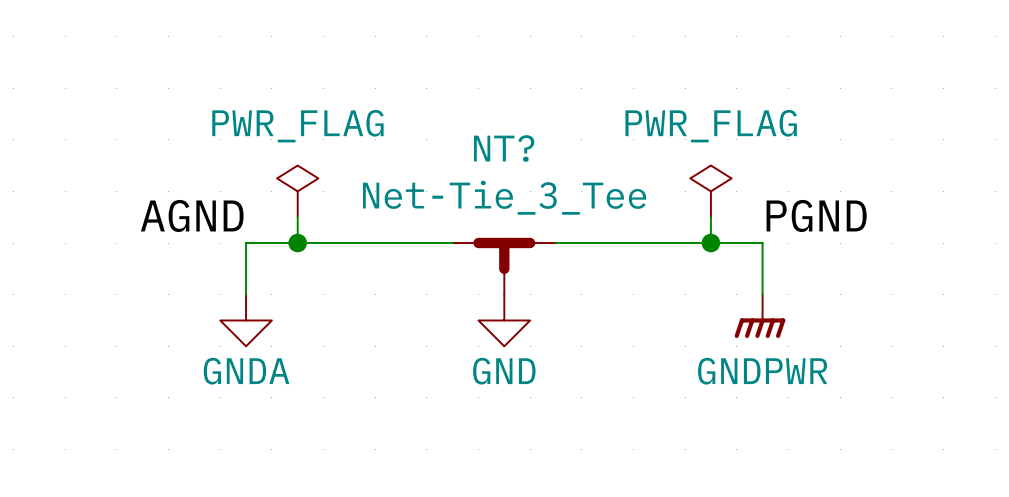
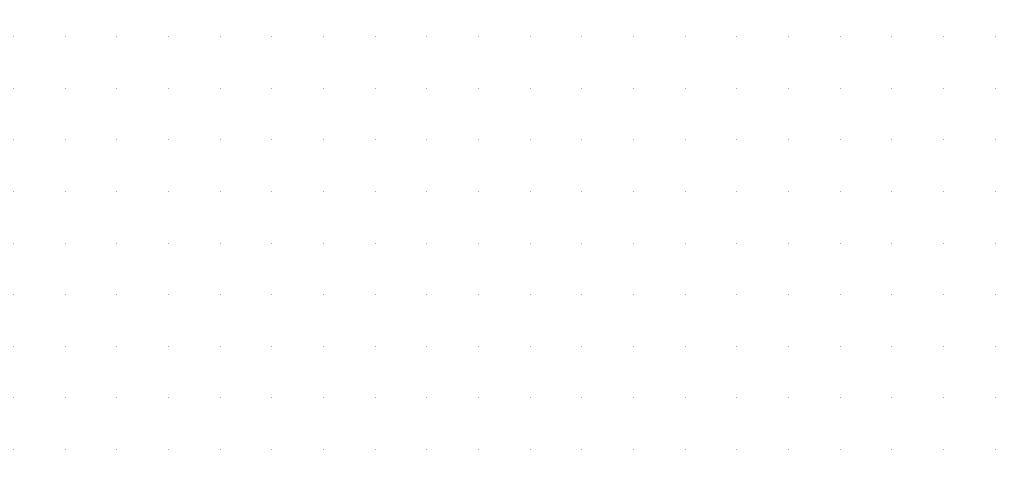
power symbol: PWR_FLAG (297, 191) -> none
power symbol: PWR_FLAG (710, 191) -> none
label: AGND (192, 215) -> none
label: PGND (816, 215) -> none
wire: (297, 217) (297, 243) -> none
wire: (710, 217) (710, 243) -> none
junction: (297, 243) -> none
wire: (452, 243) (246, 243) (246, 294) -> none
wire: (555, 243) (762, 243) (762, 294) -> none
junction: (710, 243) -> none
NT?: Net-Tie_3_Tee (504, 267) -> none
power symbol: GNDPWR (759, 316) -> none
power symbol: GNDA (246, 320) -> none
power symbol: GND (504, 320) -> none

